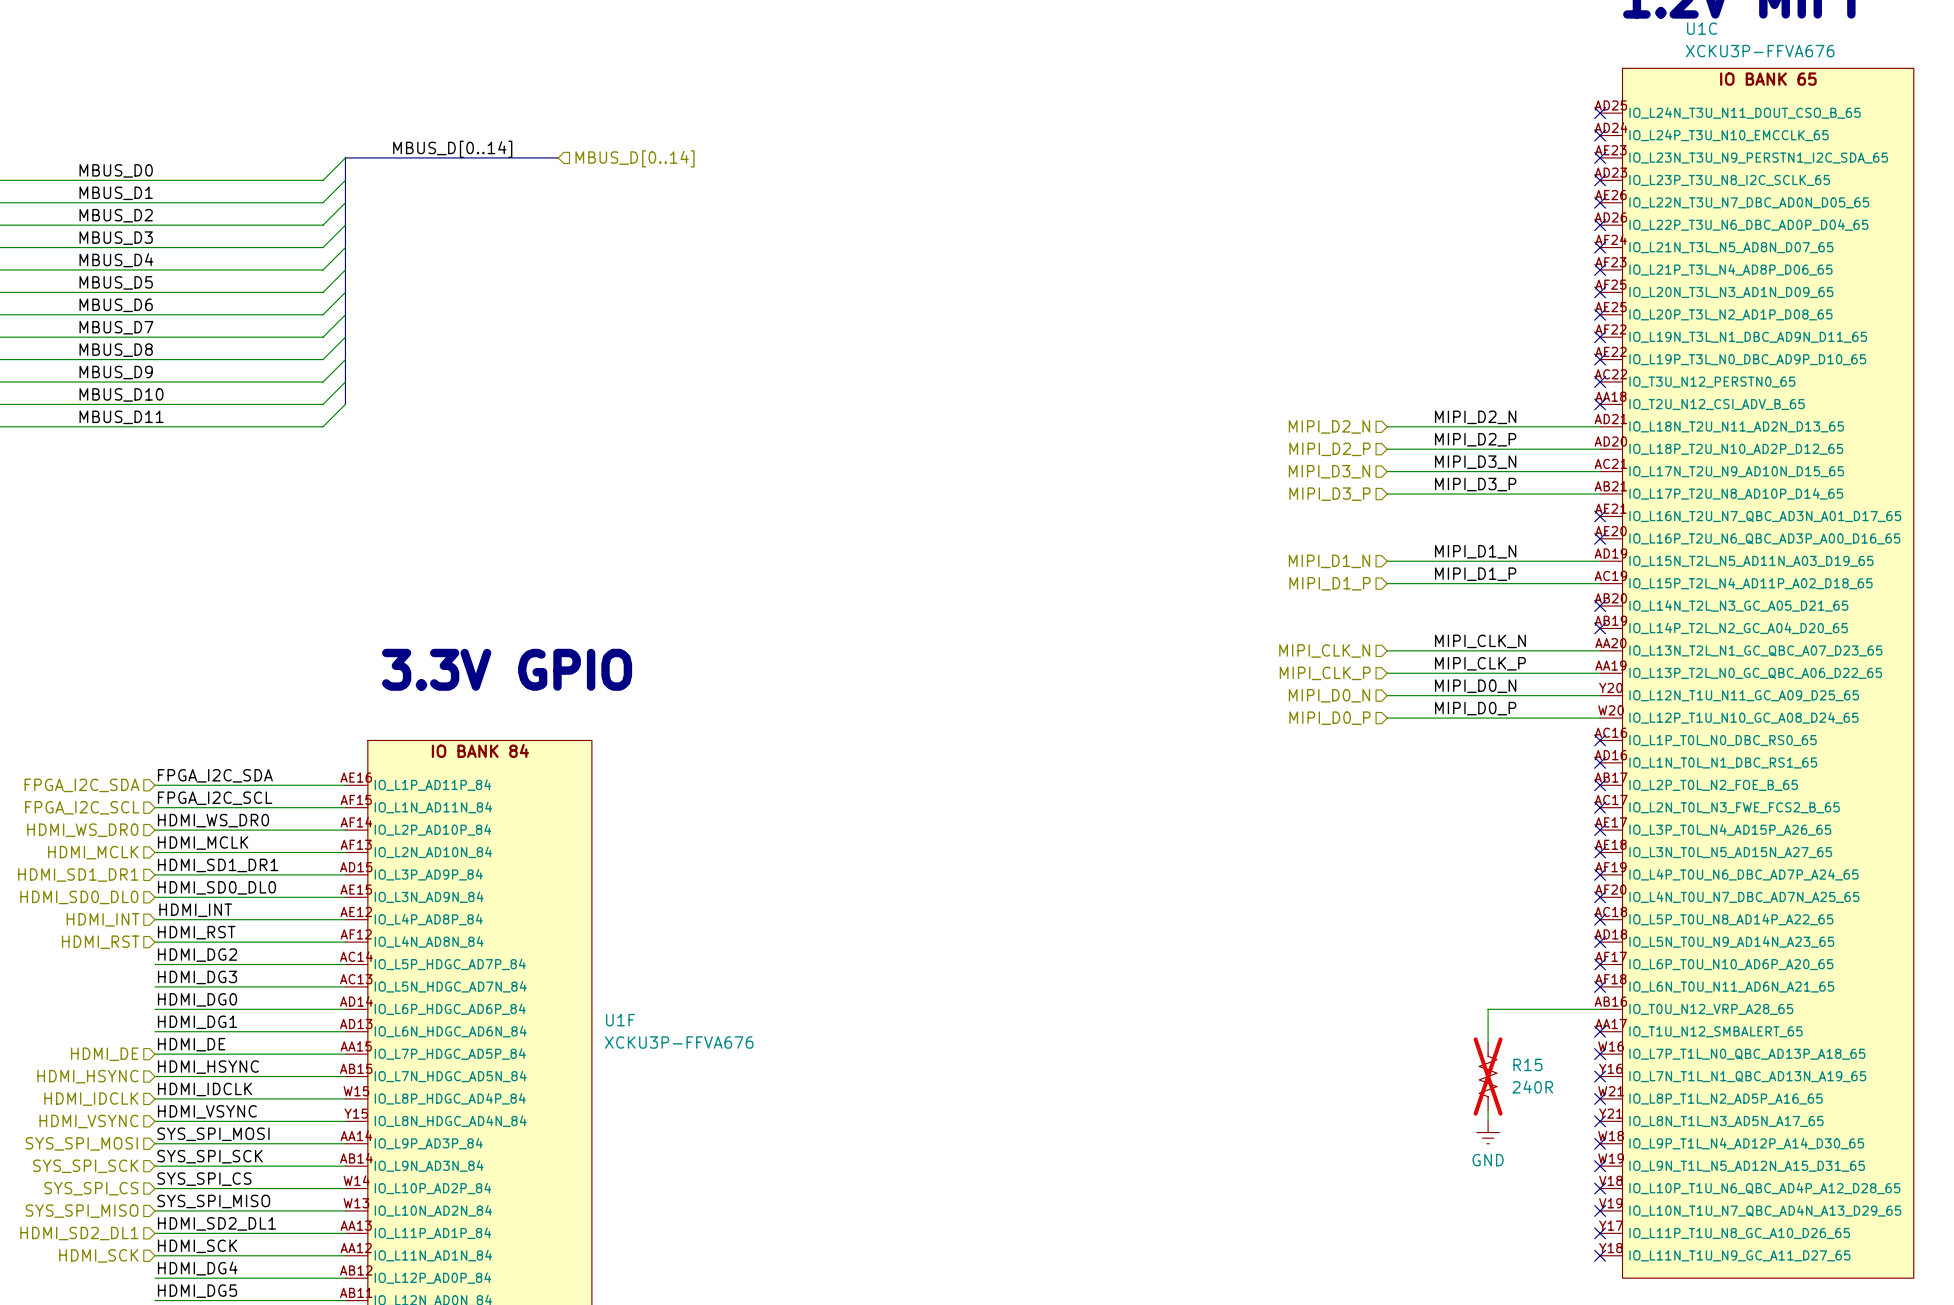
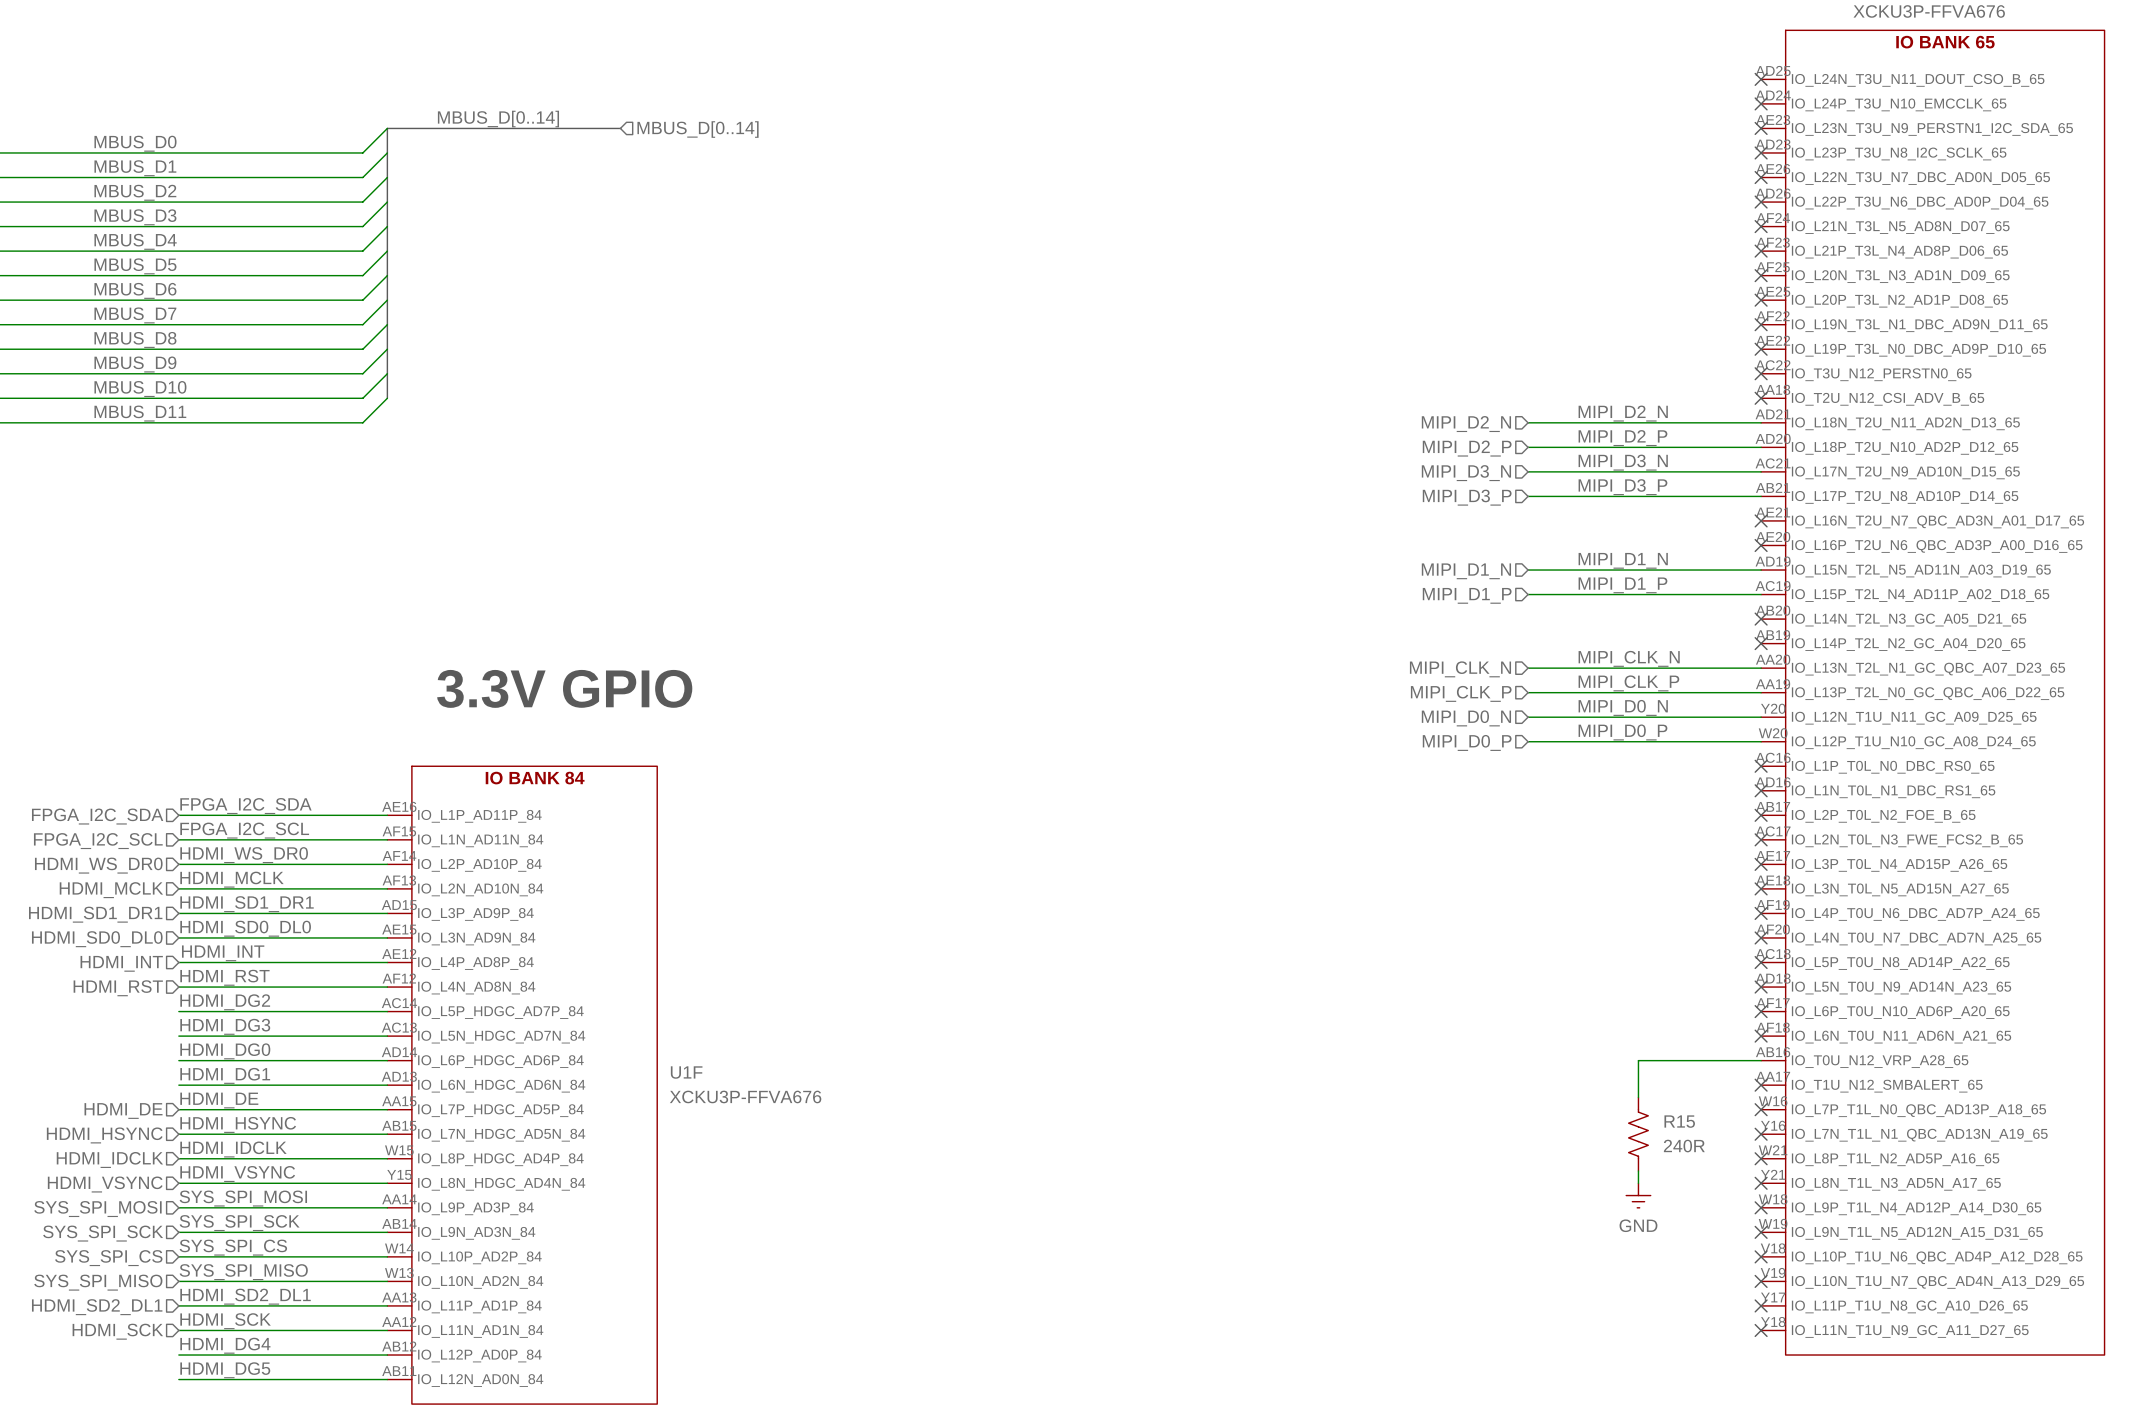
R15 do-not-place cross: (1488, 1076) -> none

